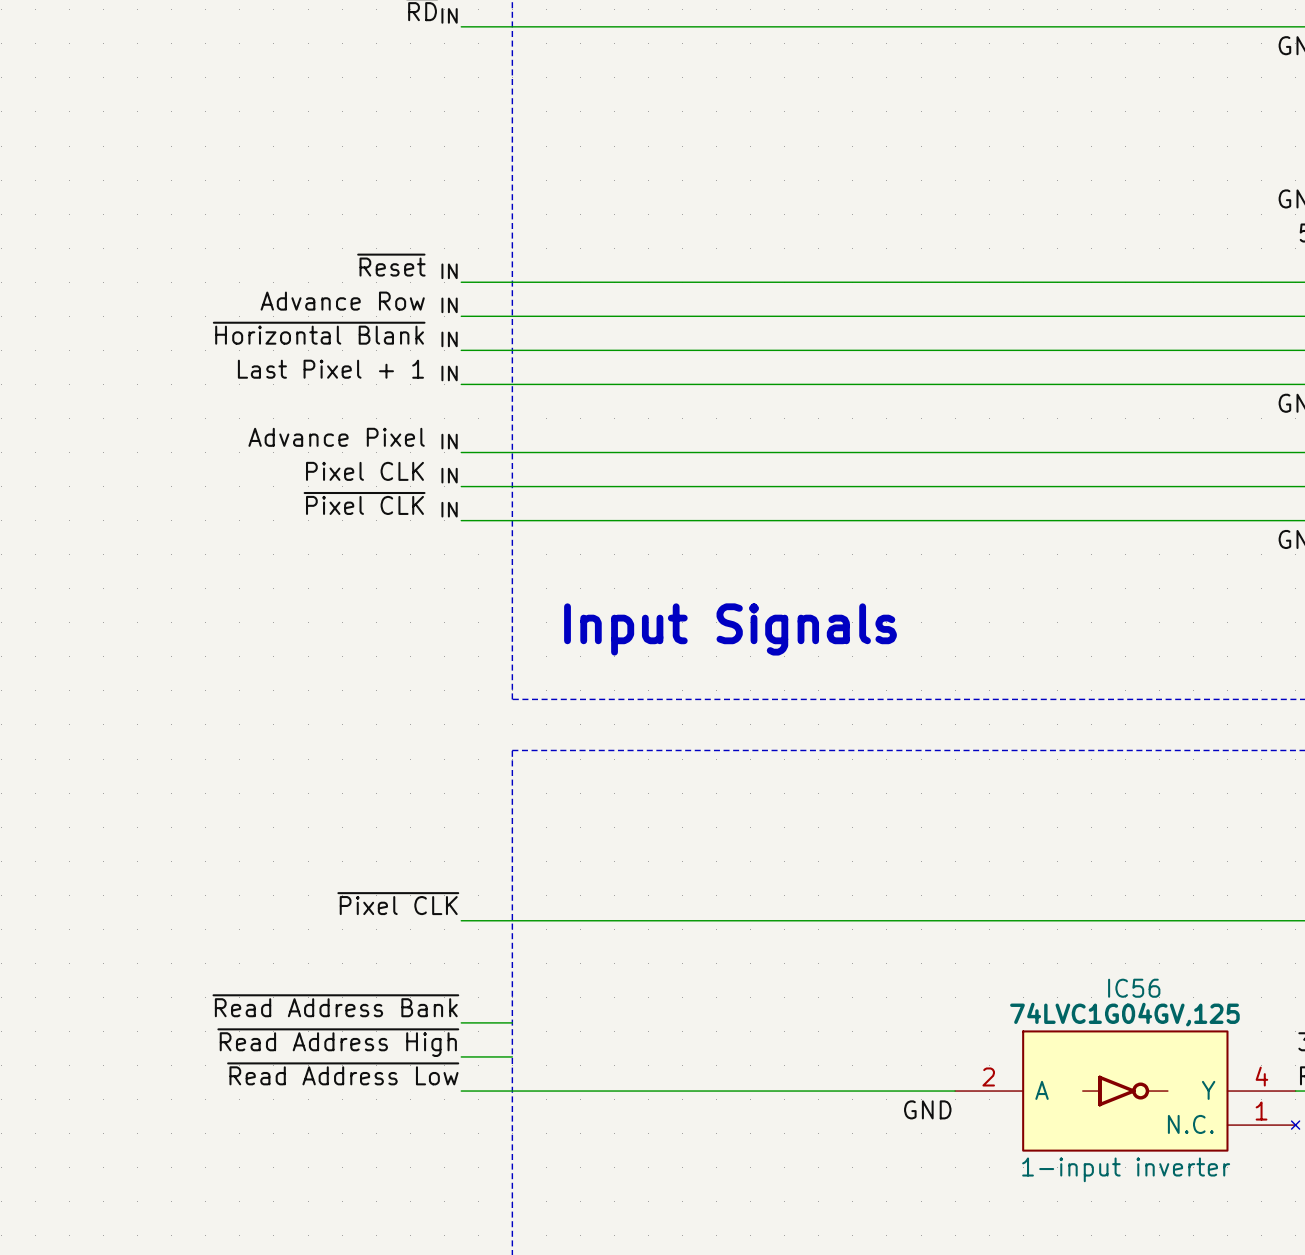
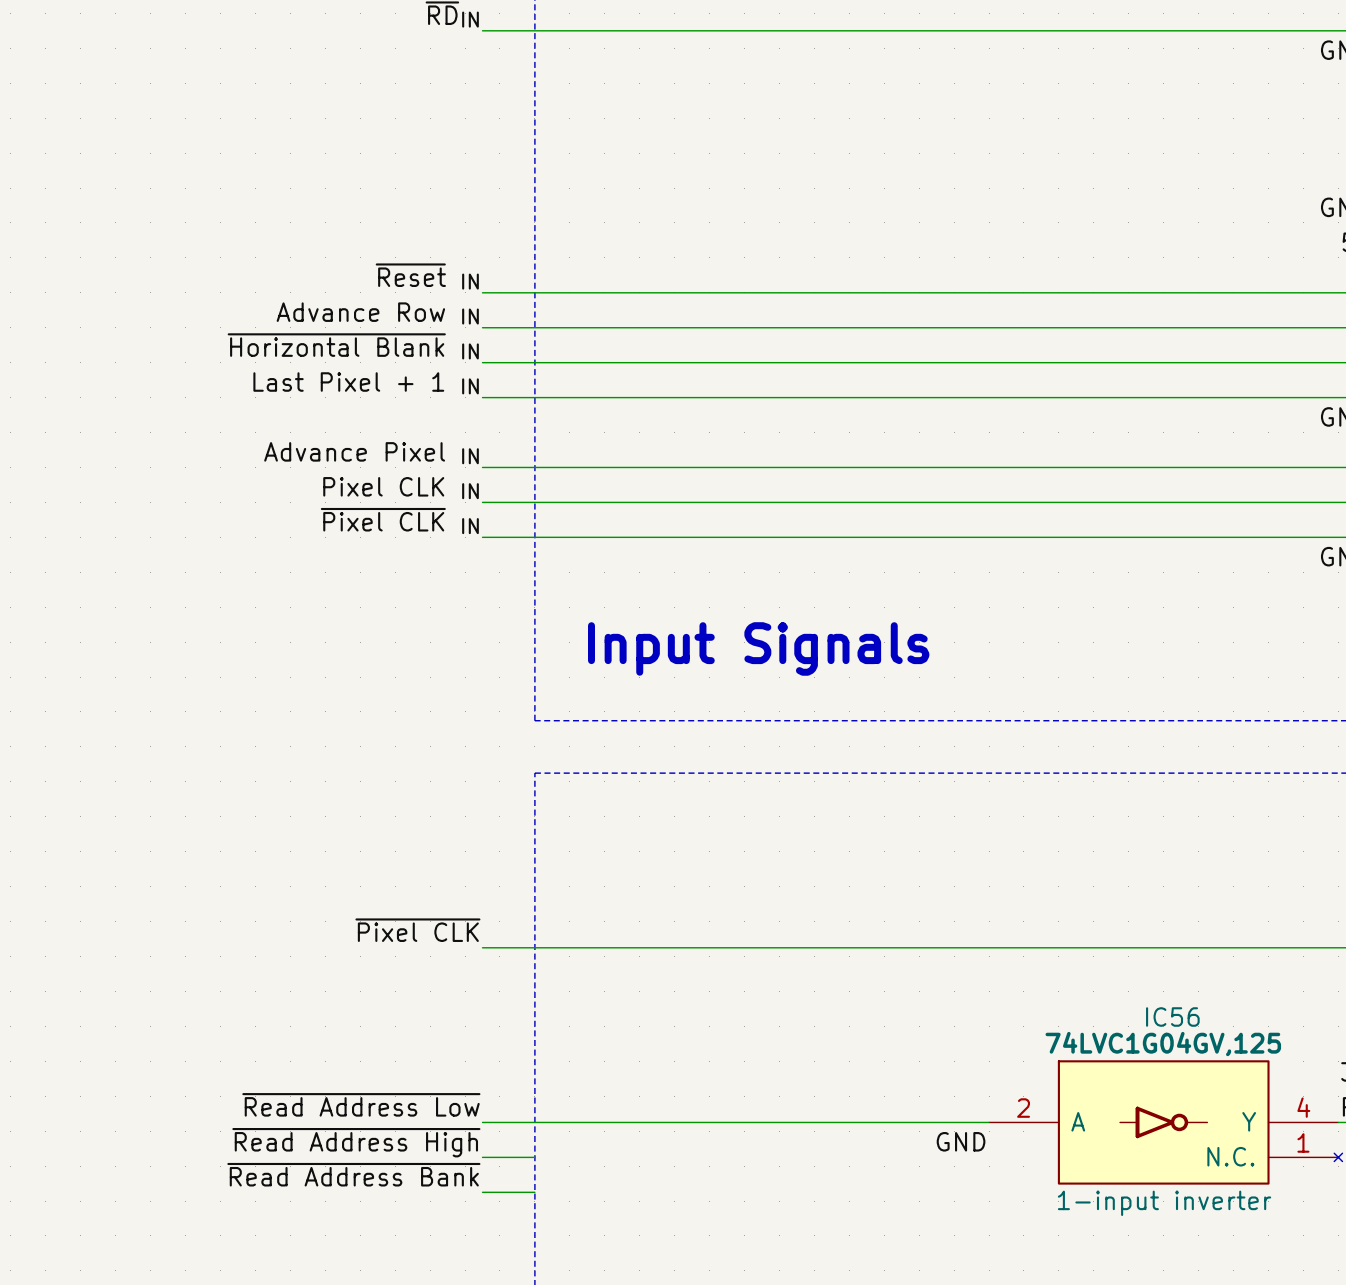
label position: ~{Read Address Bank} (335, 1005) -> ~{Read Address Bank} (353, 1174)
wire: (461, 1022) (512, 1022) -> (482, 1157) (534, 1157)
label position: ~{Read Address High} (338, 1042) -> ~{Read Address High} (356, 1142)
wire: (461, 1056) (512, 1056) -> (482, 1192) (534, 1192)

